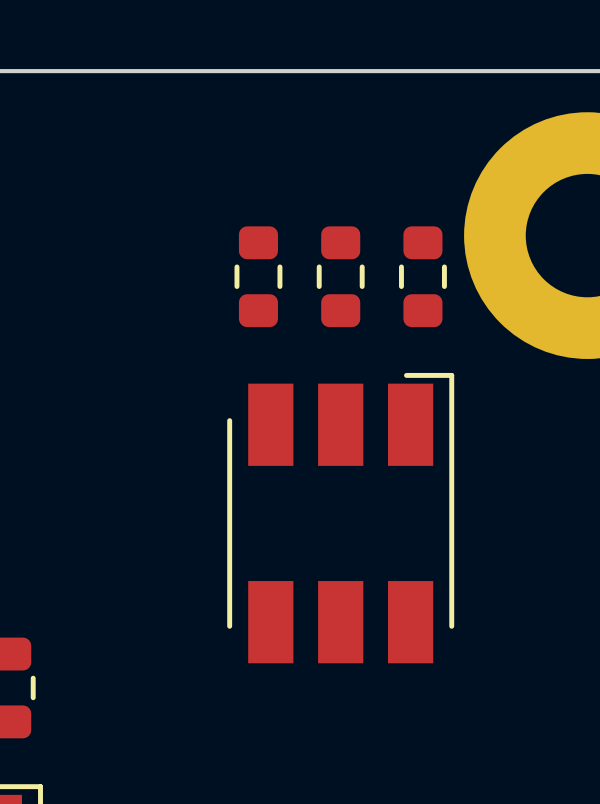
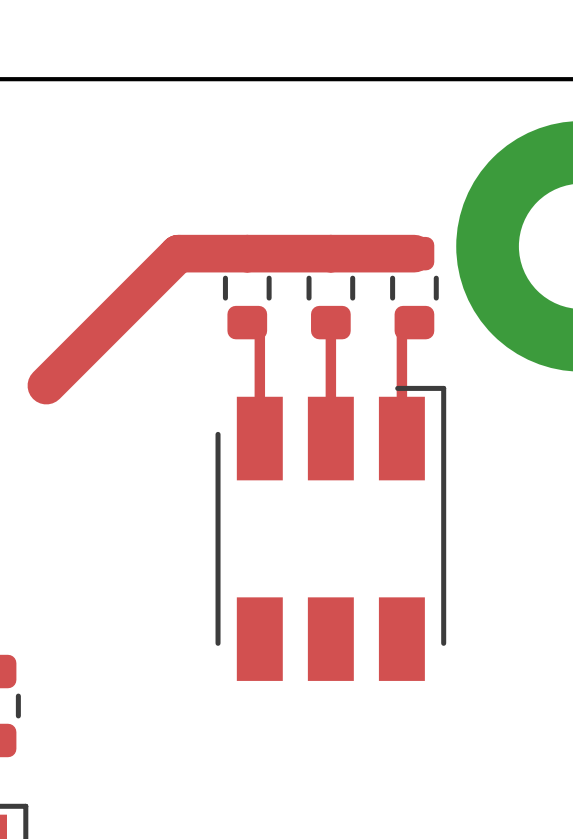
track: none -> (414, 253) (178, 253) (46, 385)
track: none -> (247, 322) (259, 335) (259, 438)
track: none -> (330, 322) (330, 438)
track: none -> (414, 322) (401, 335) (401, 438)

